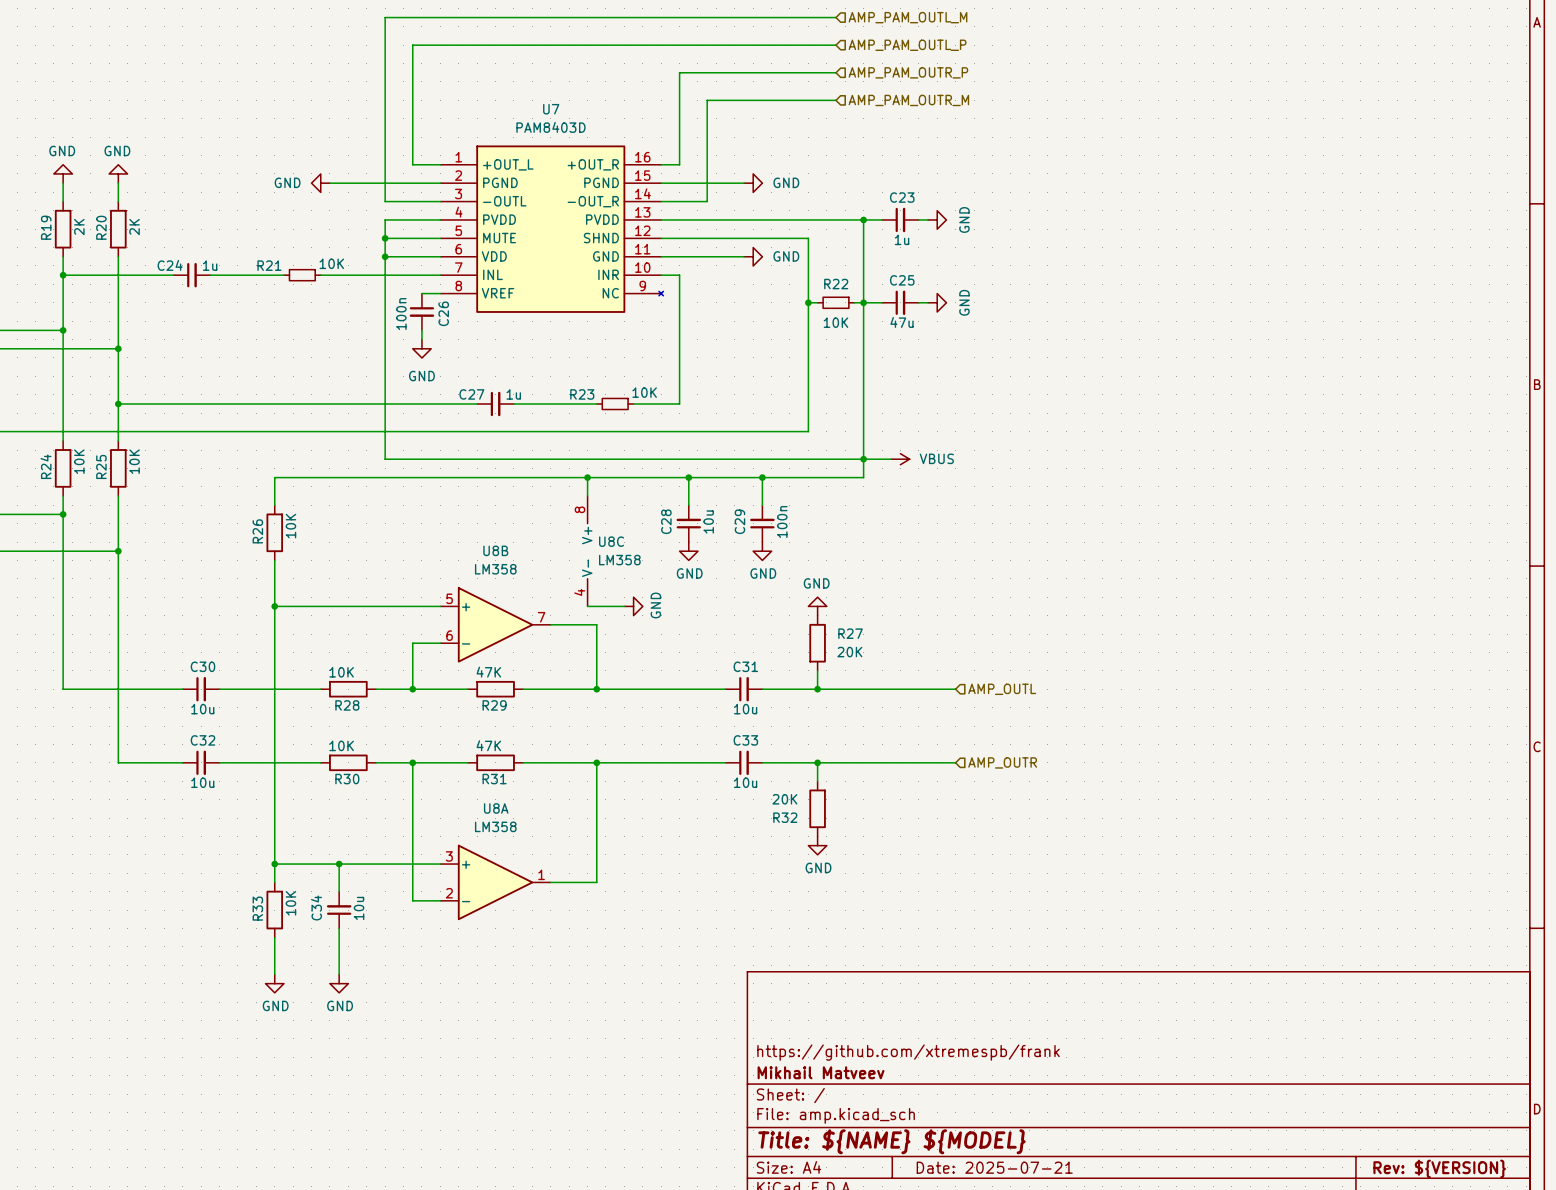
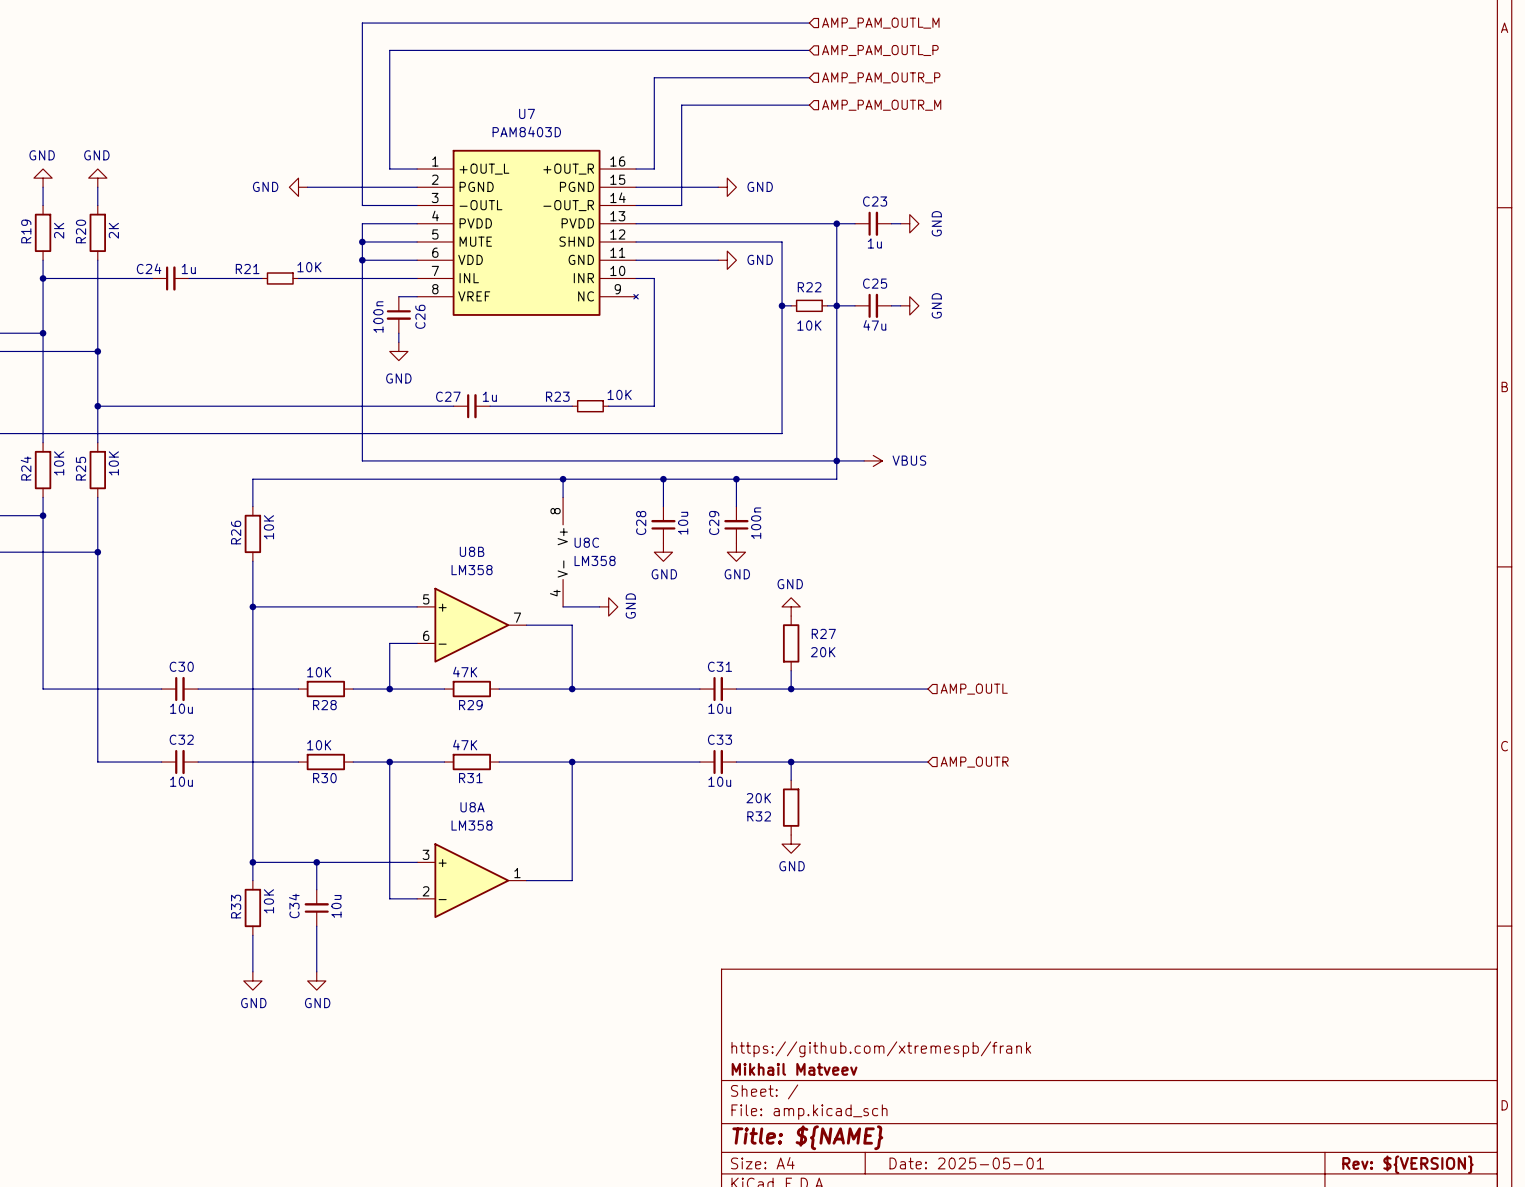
title block: Title: ${NAME} ${MODEL} (892, 1141) -> Title: ${NAME} (807, 1137)
title block: Date: 2025-07-21 (994, 1167) -> Date: 2025-05-01 (966, 1163)

